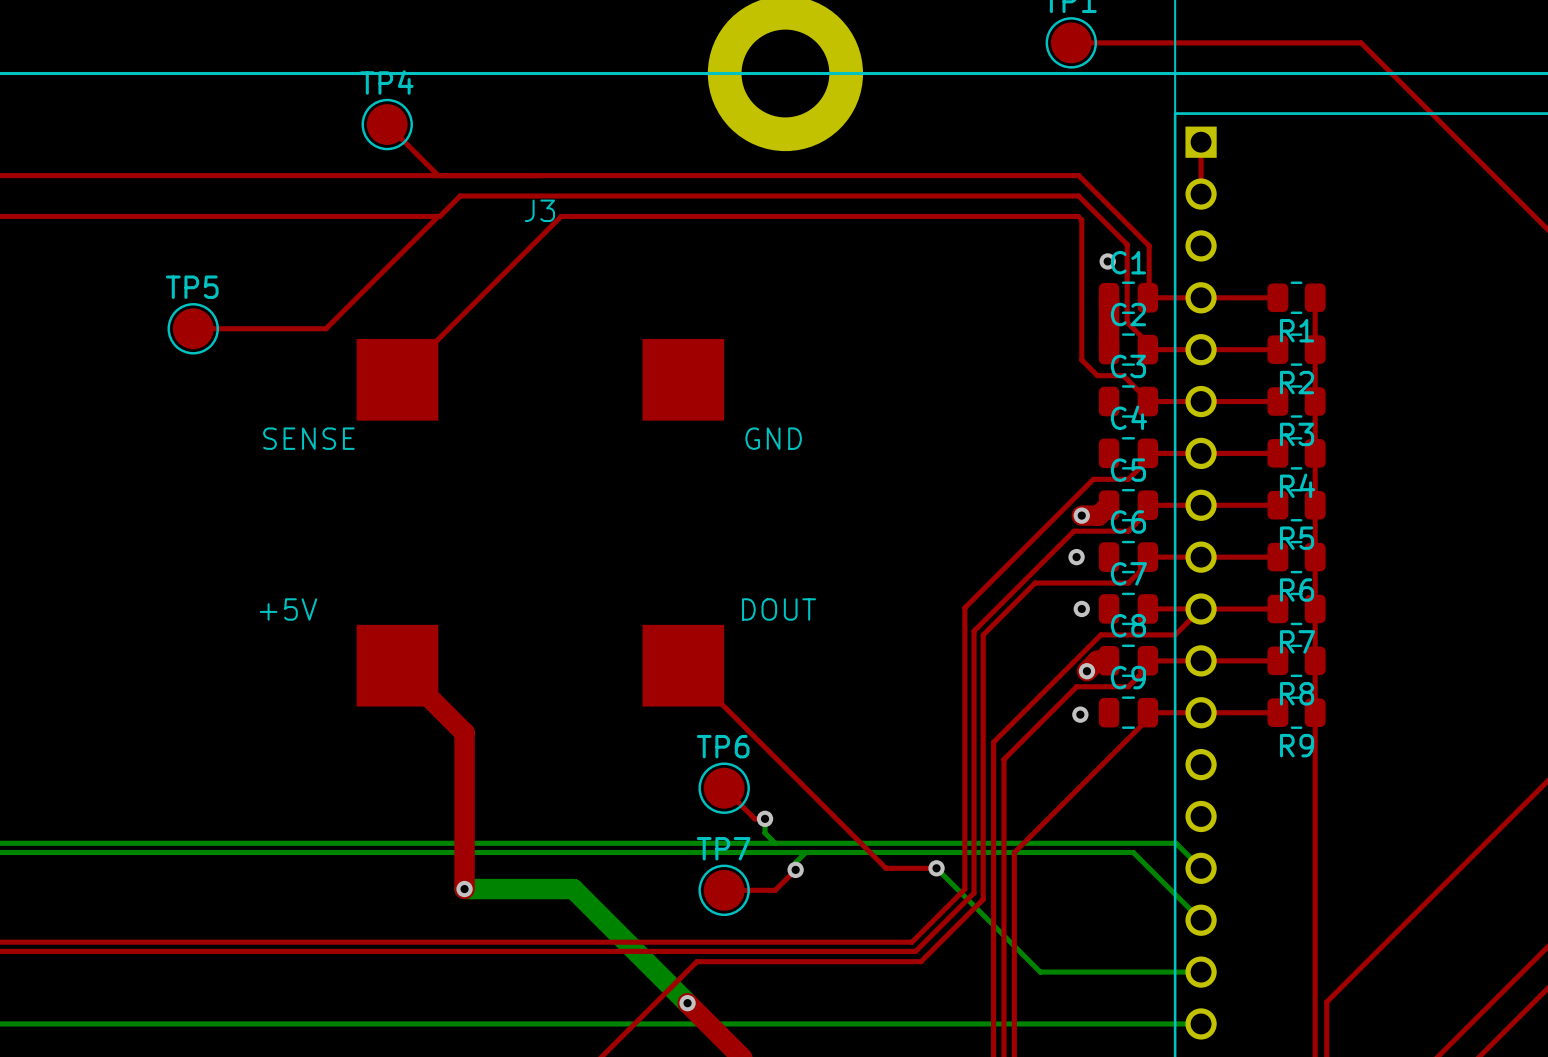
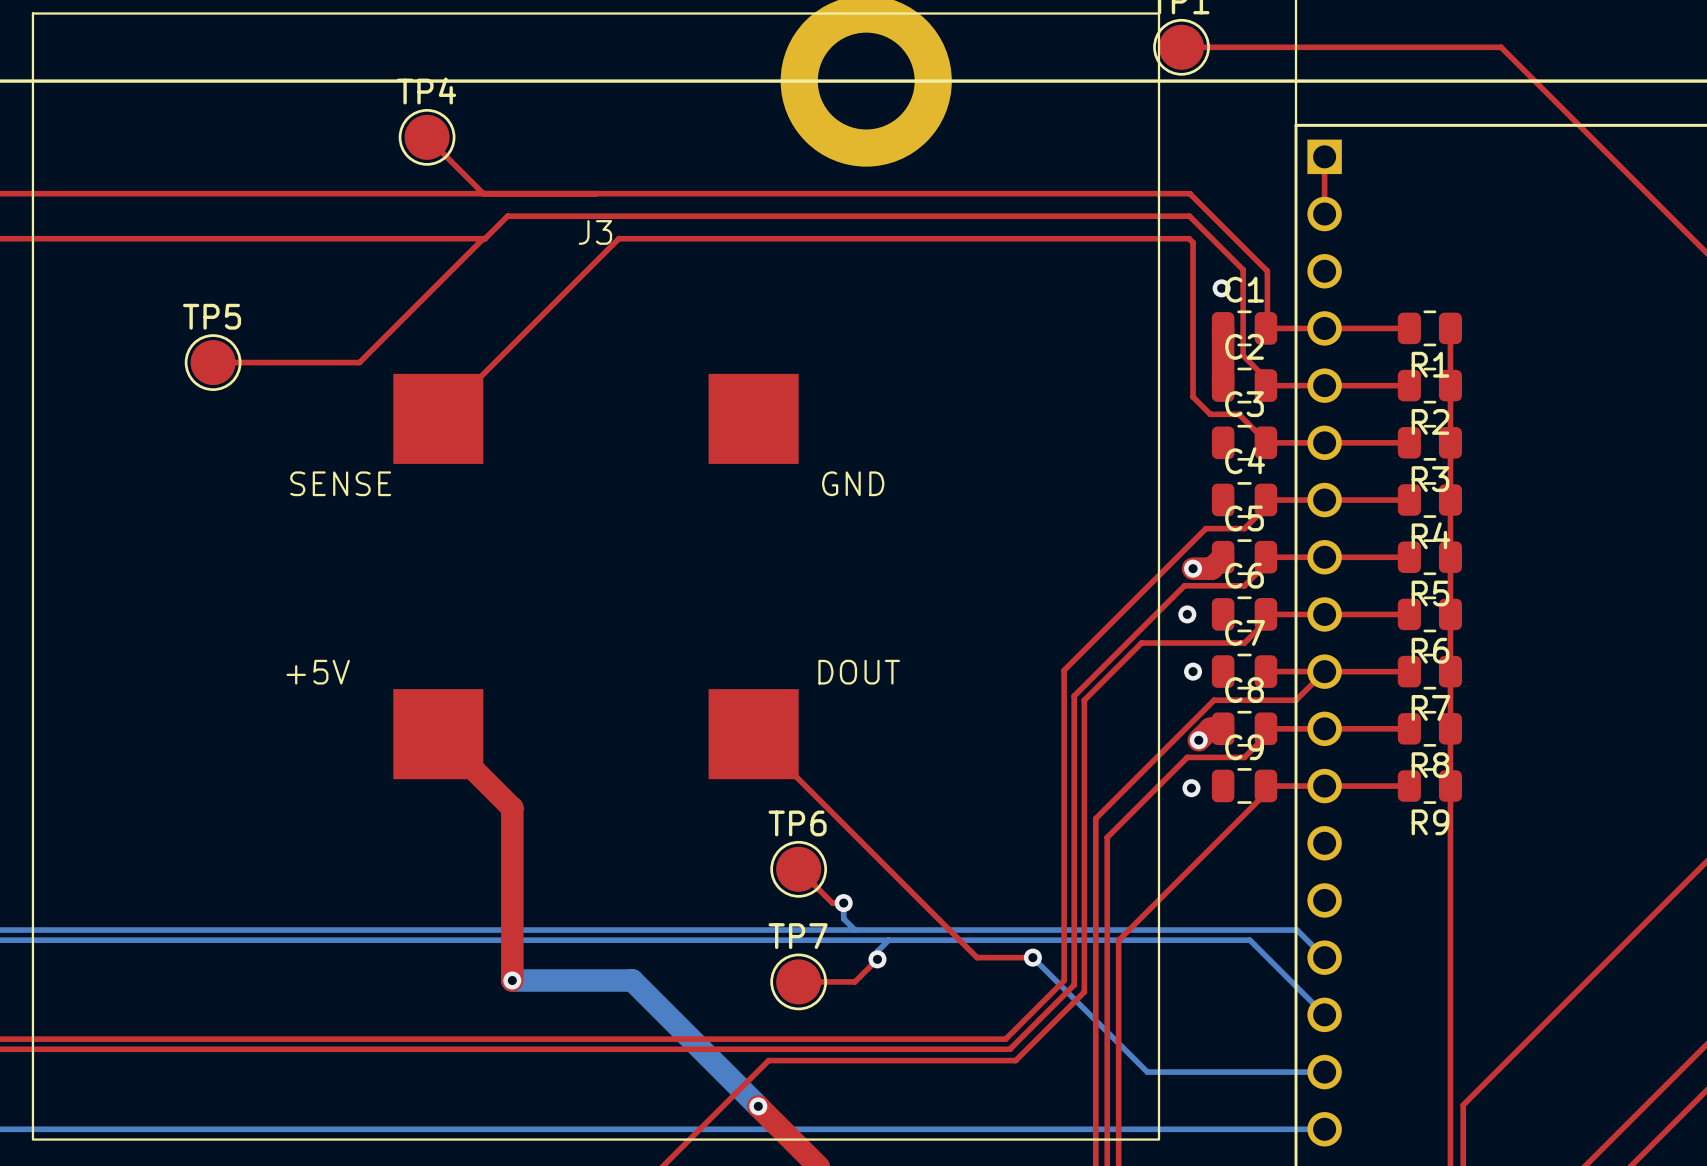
J3 footprint: [356, 338, 725, 707] -> [31, 12, 1161, 1141]

